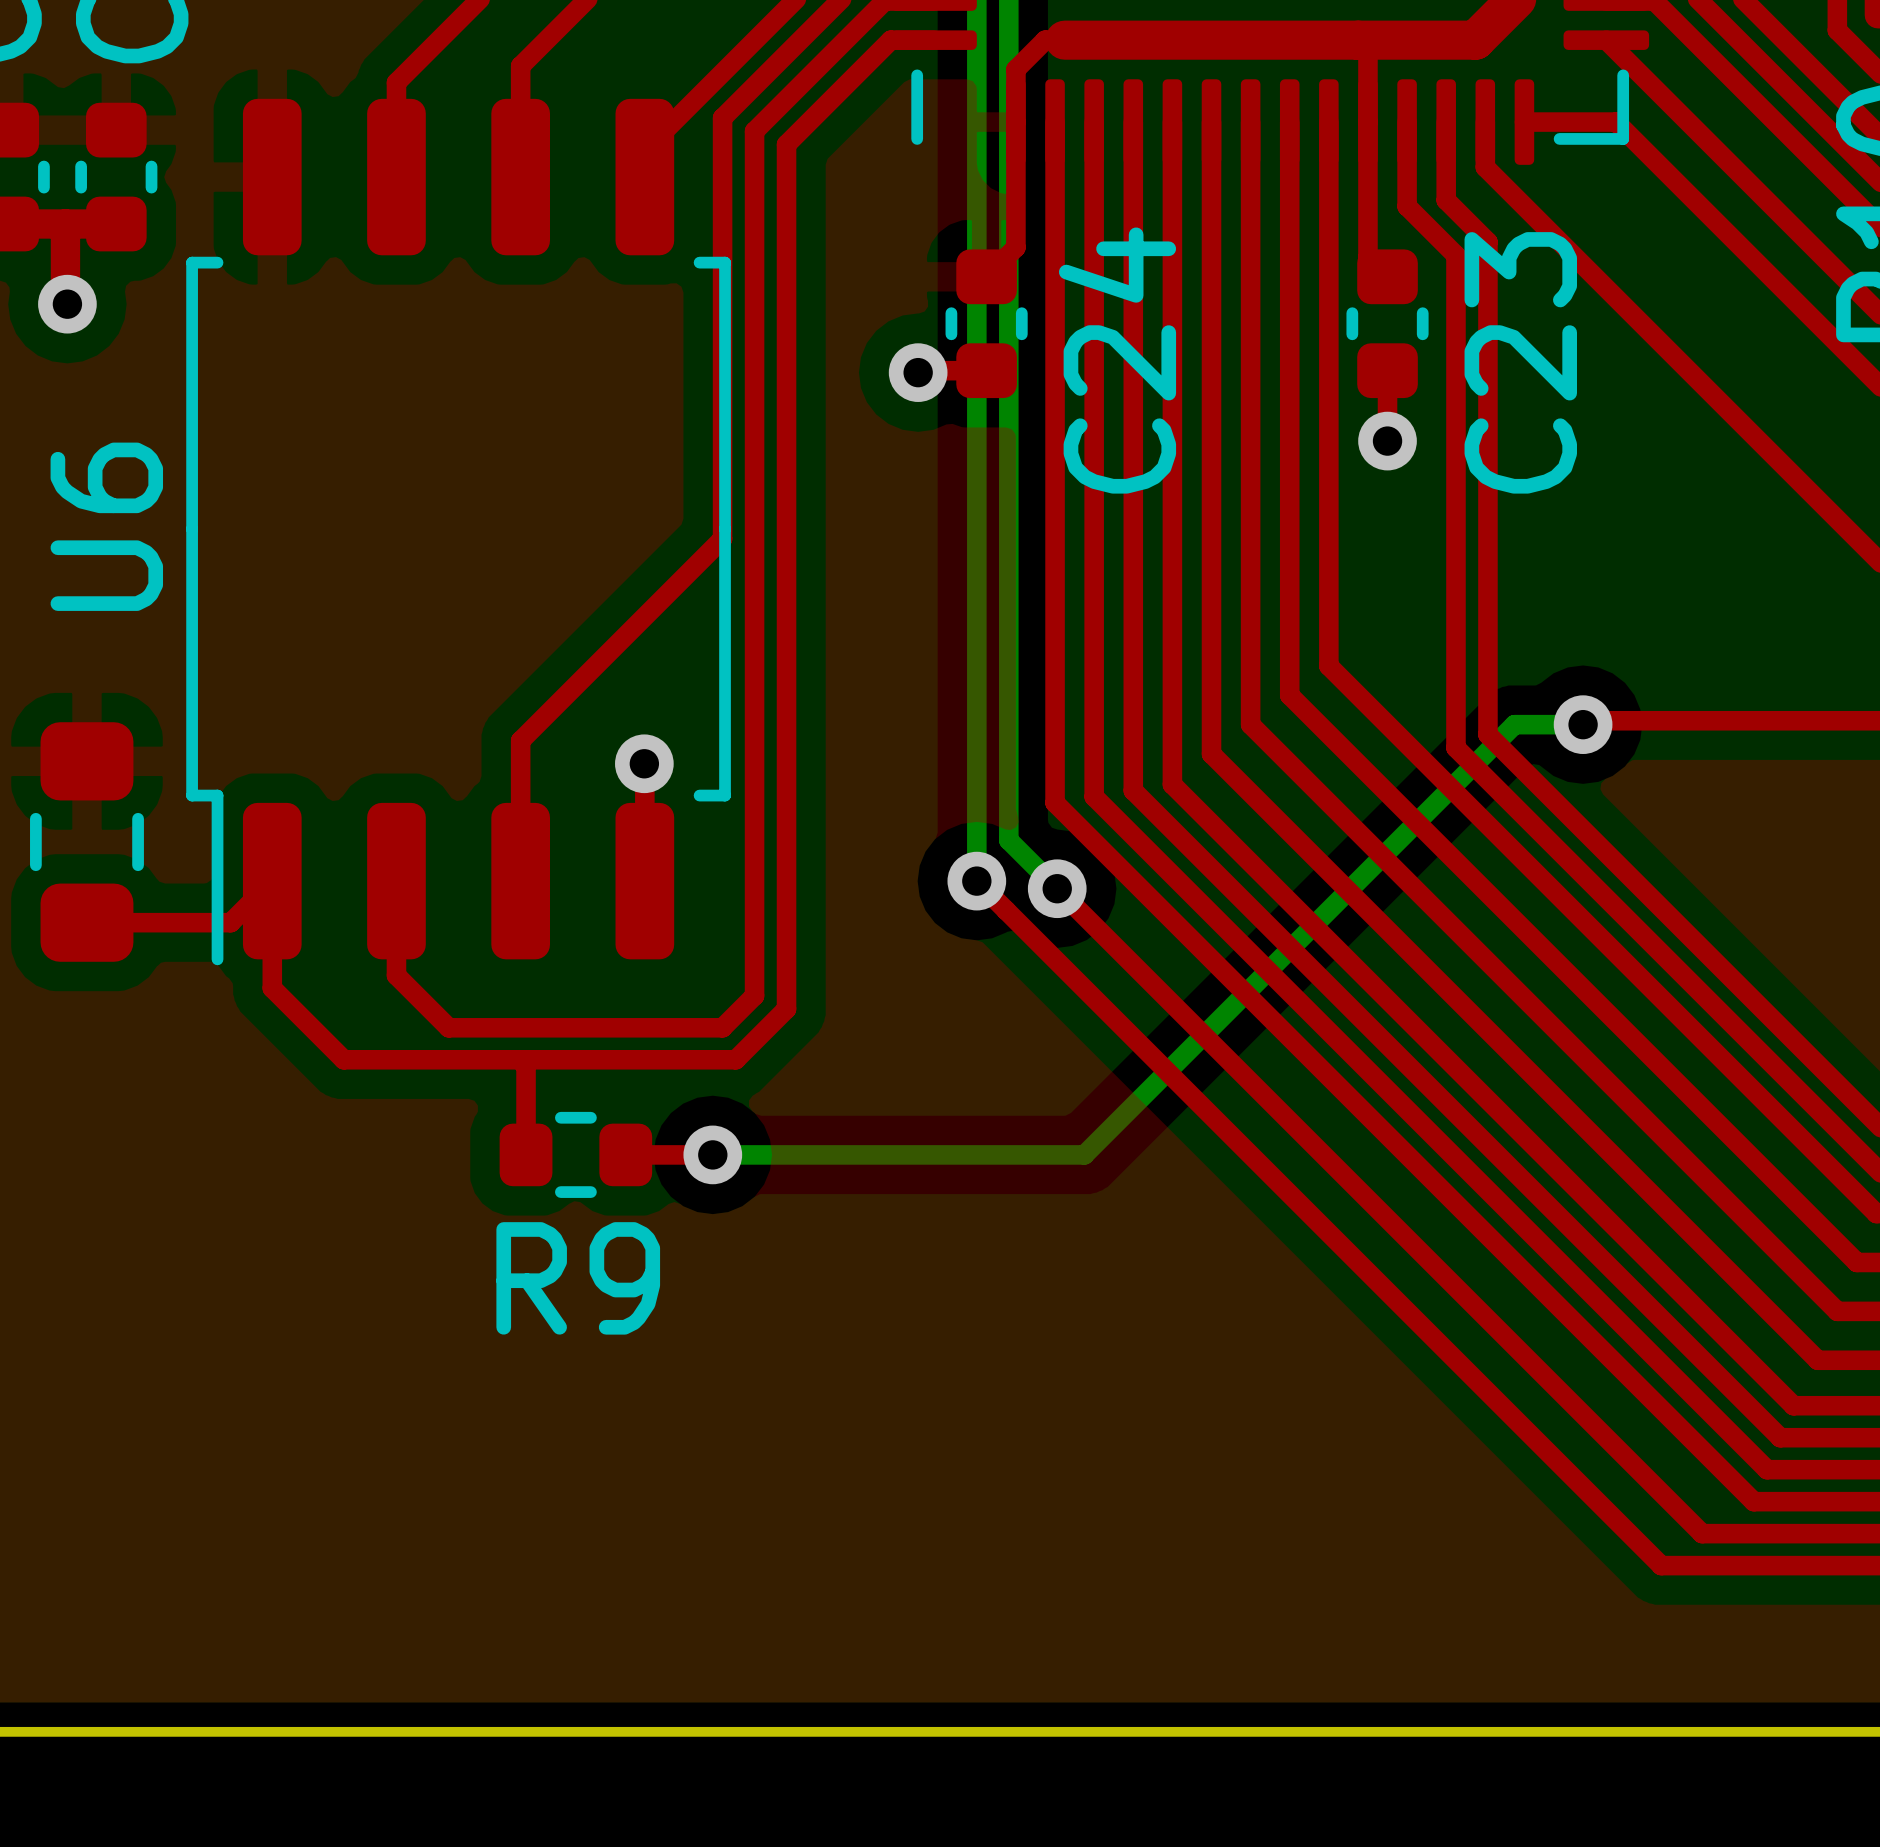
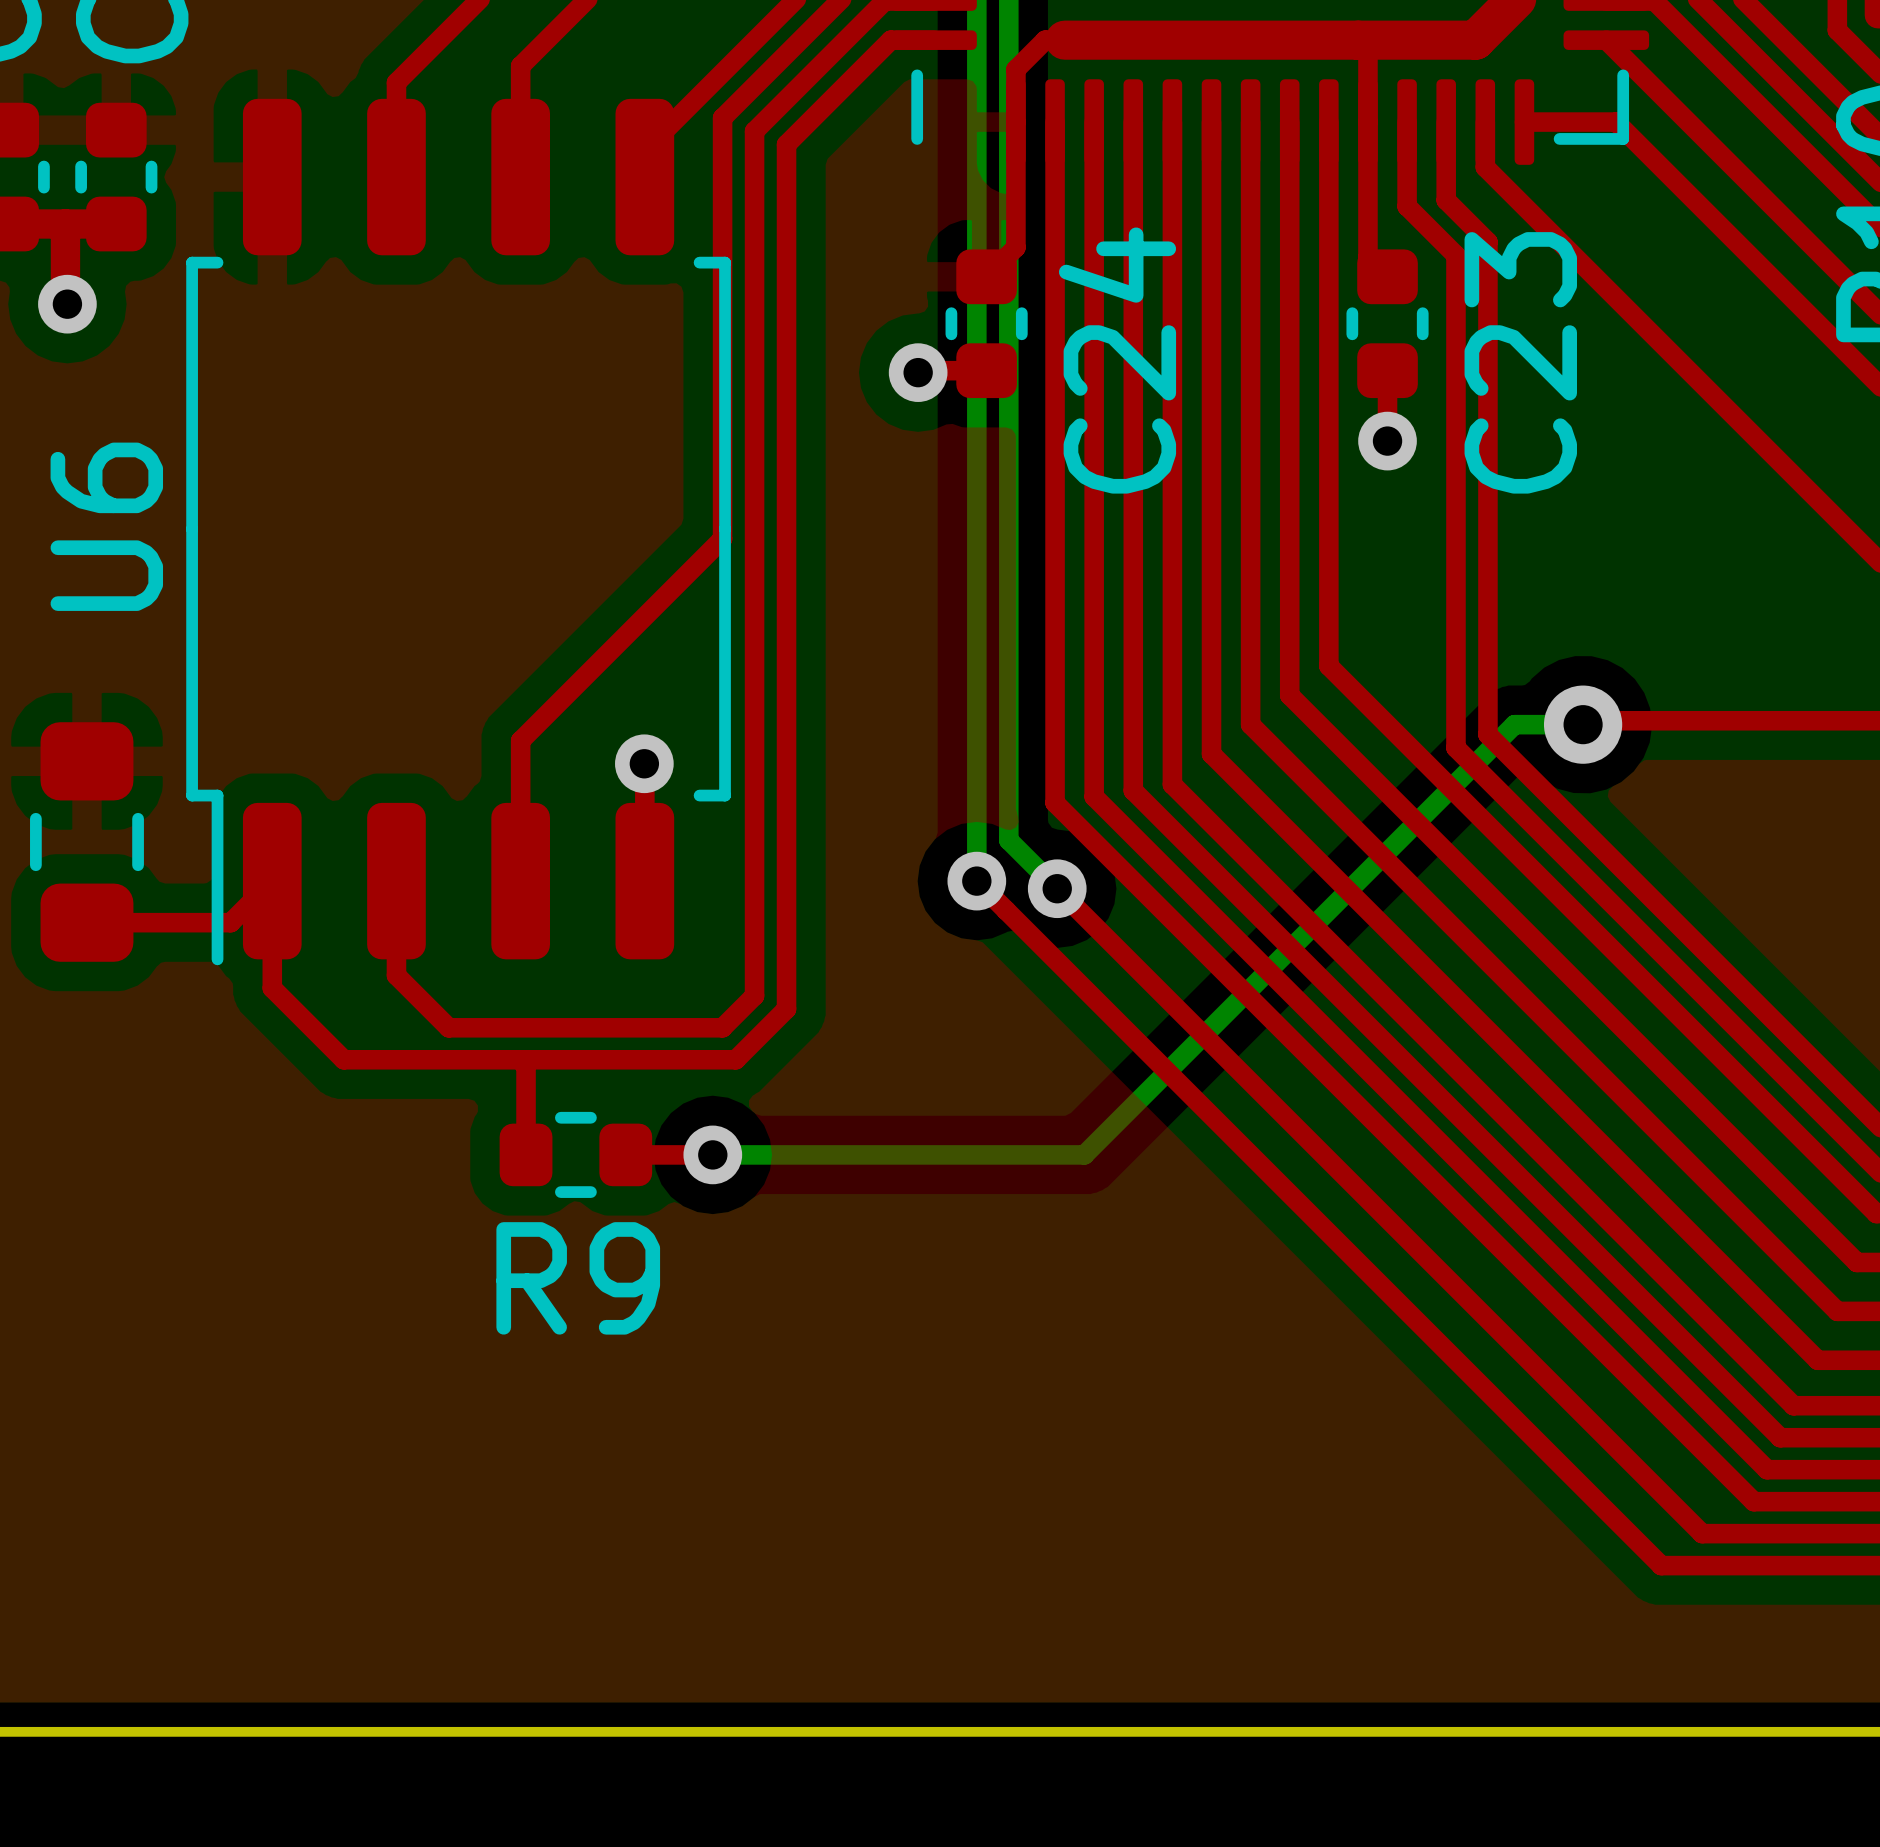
via size: [1553, 695, 1613, 754] -> [1543, 685, 1623, 764]

